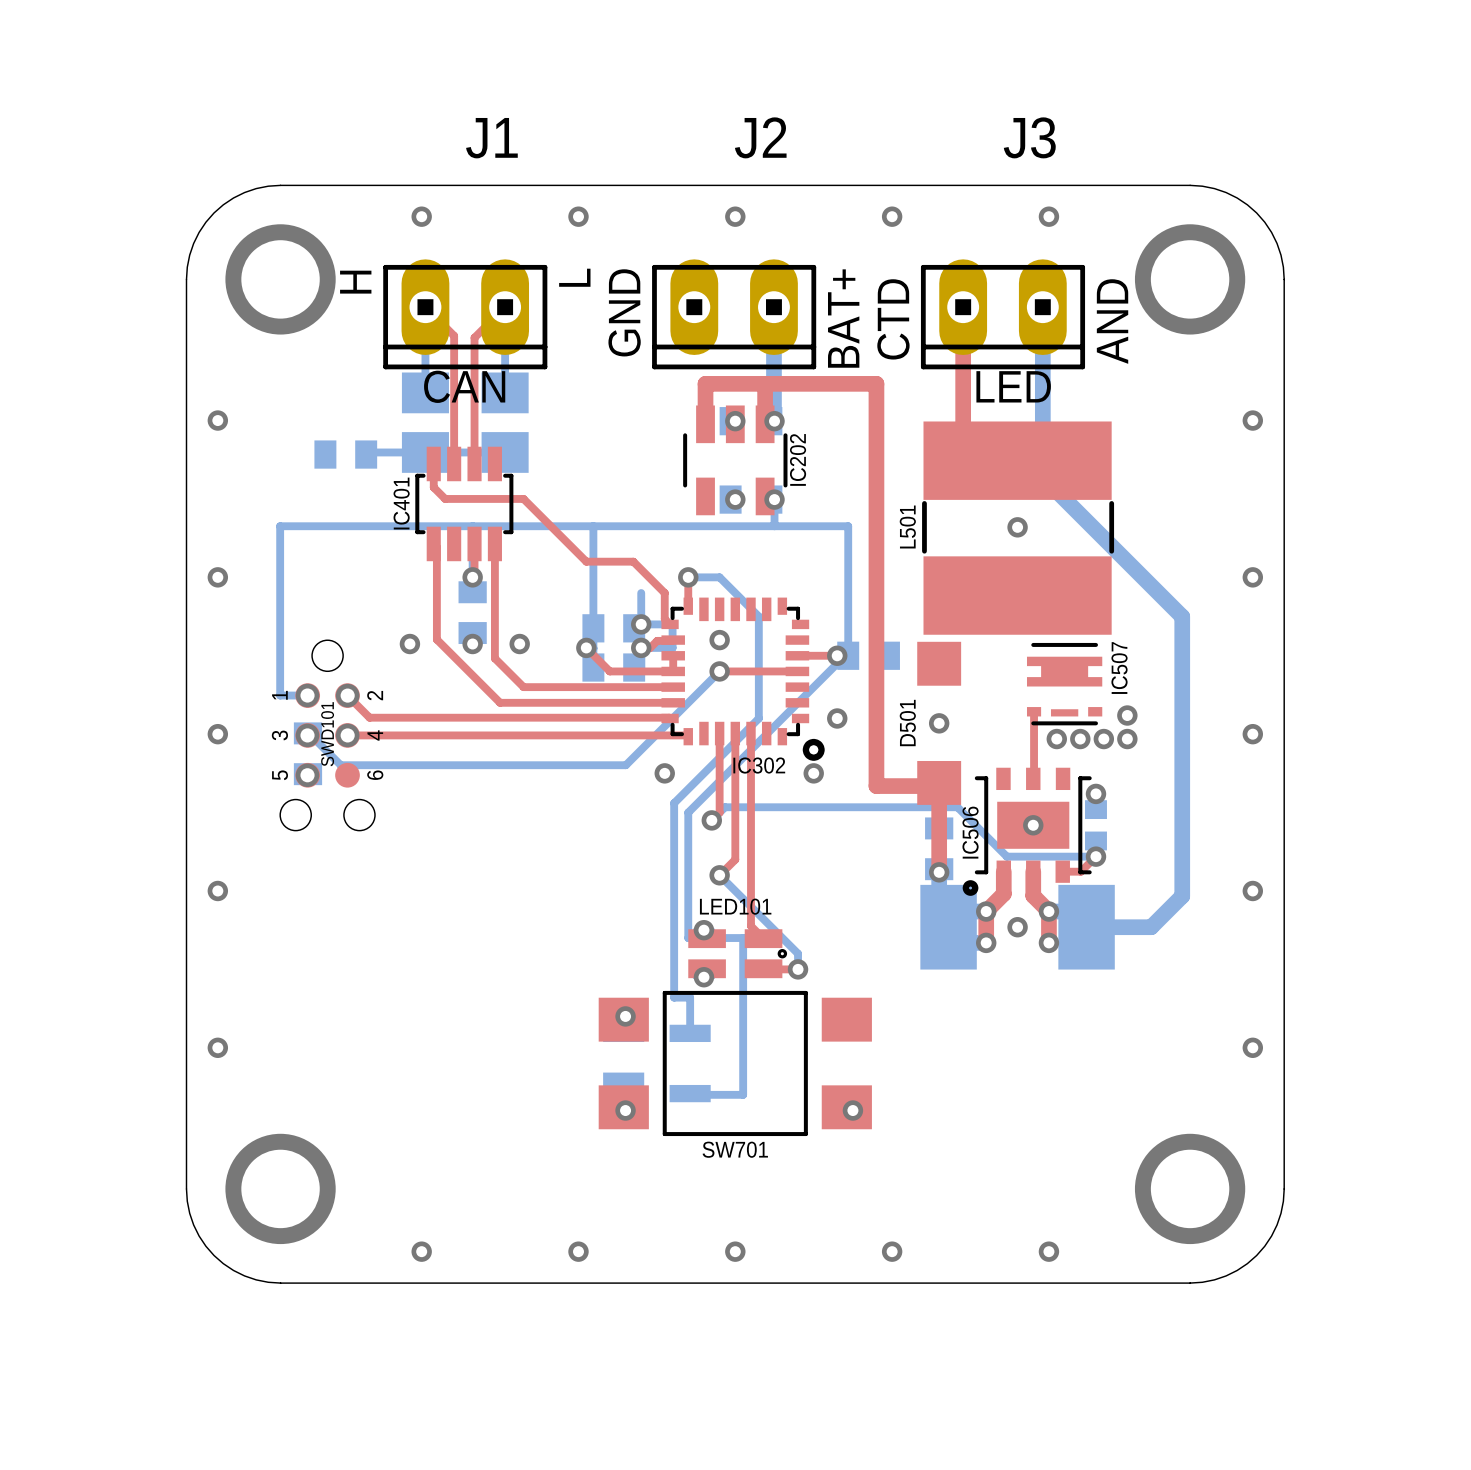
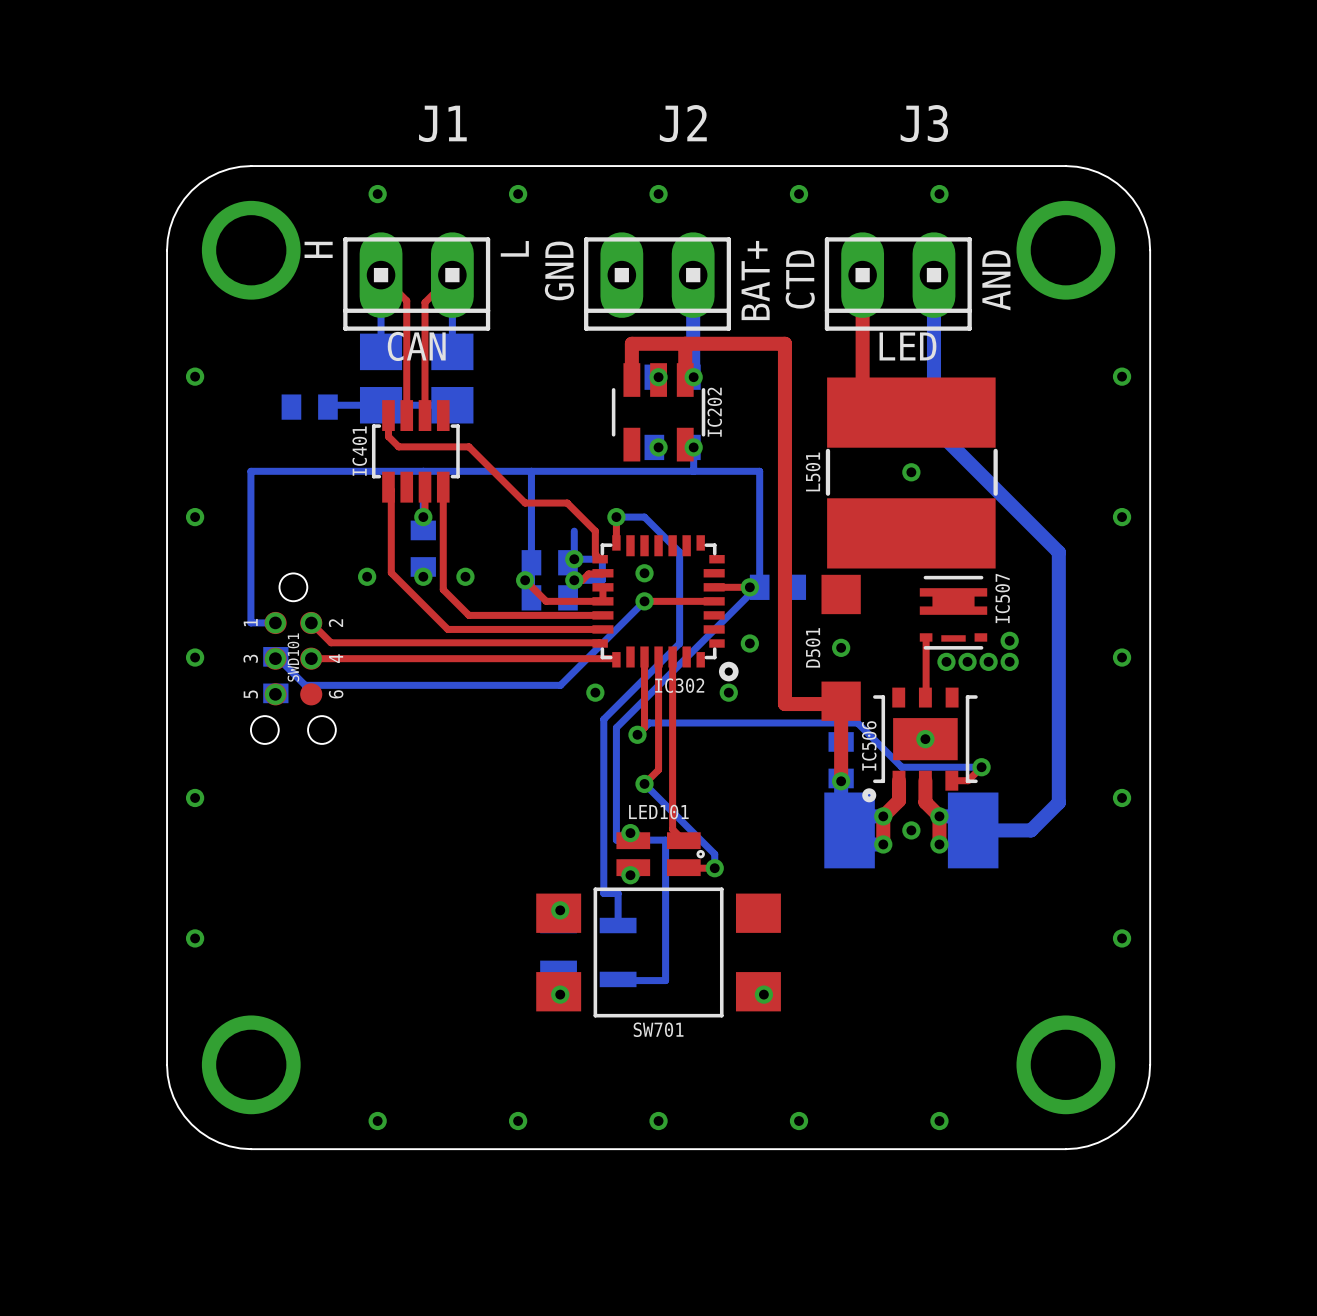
via: (1095, 793) -> none
part: (1095, 825) -> none

